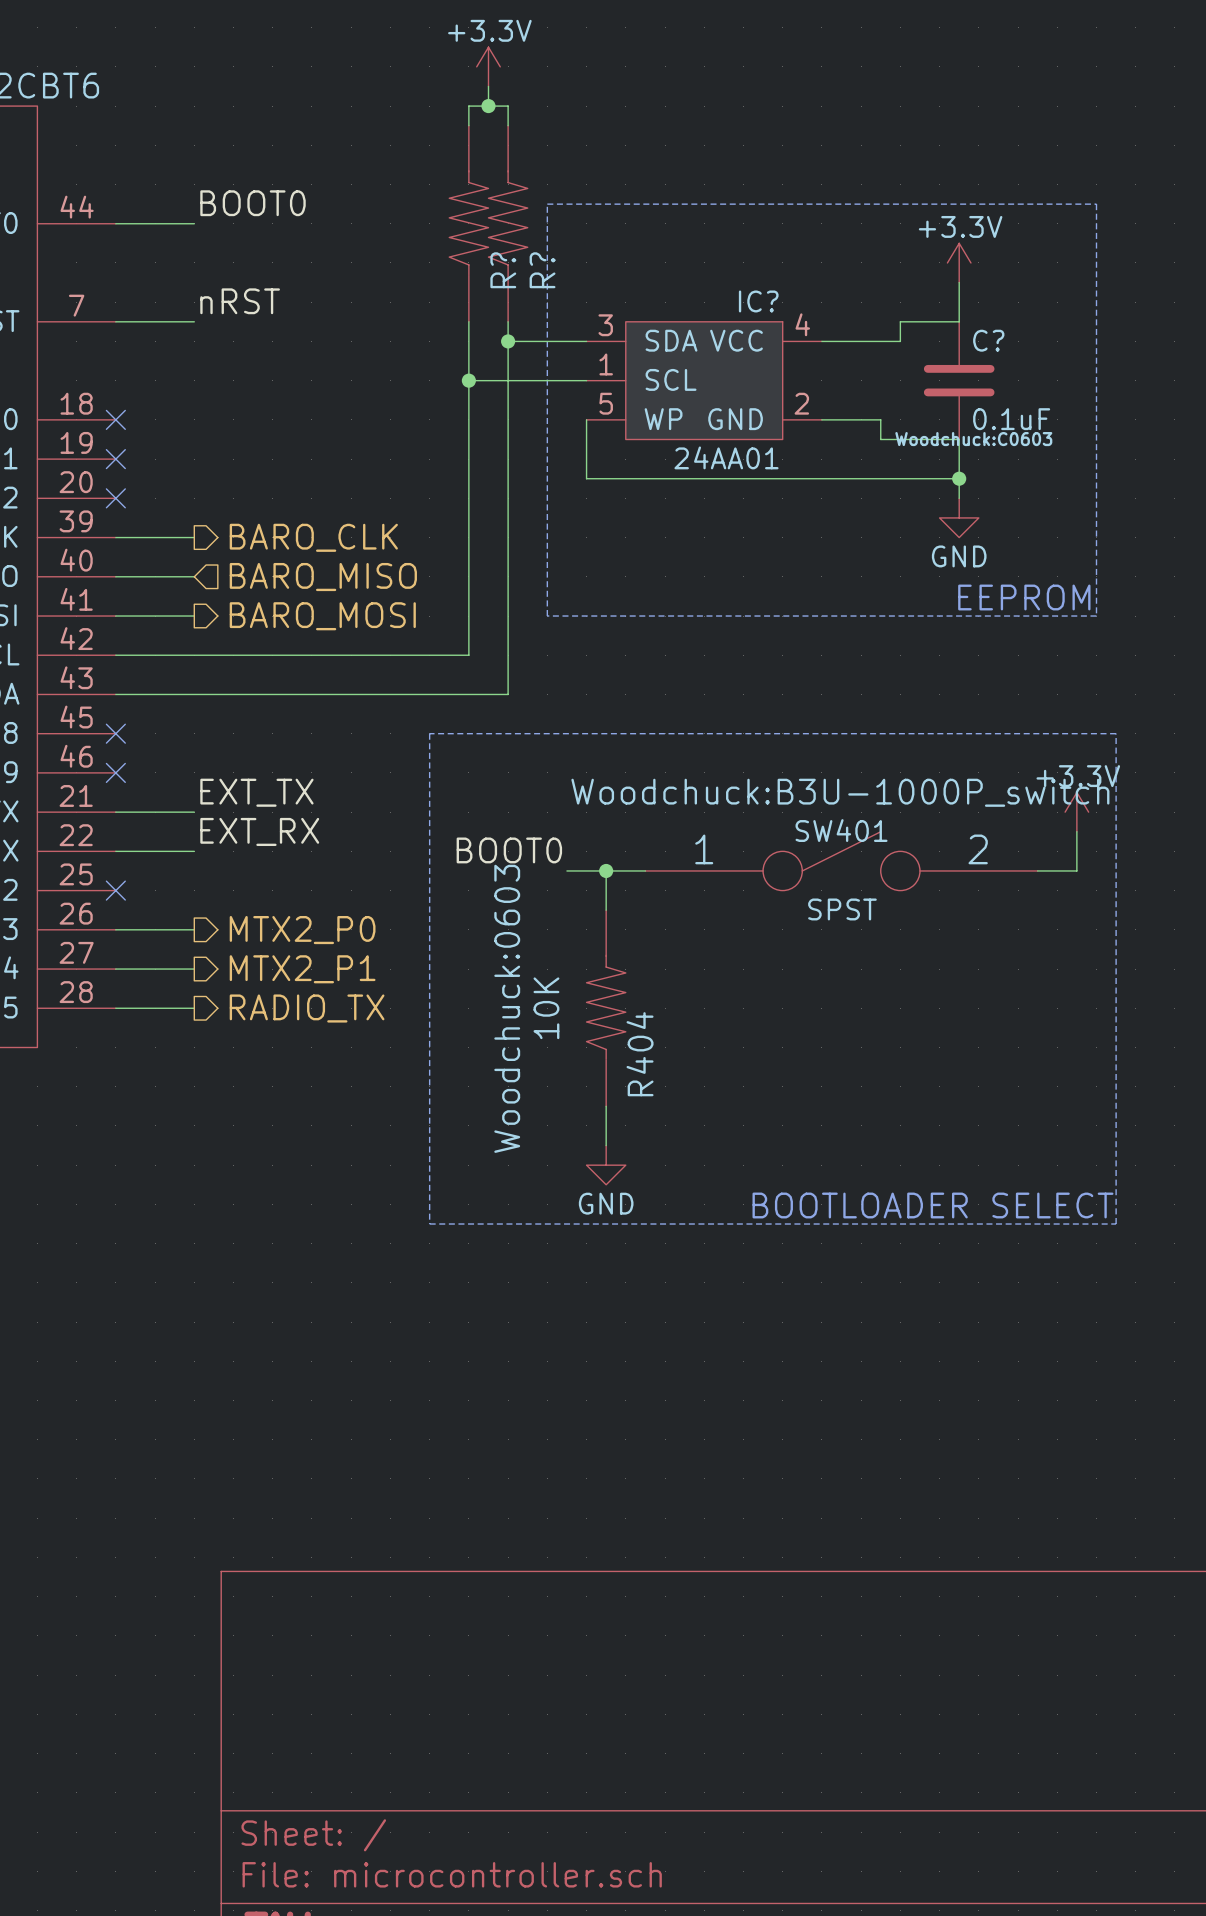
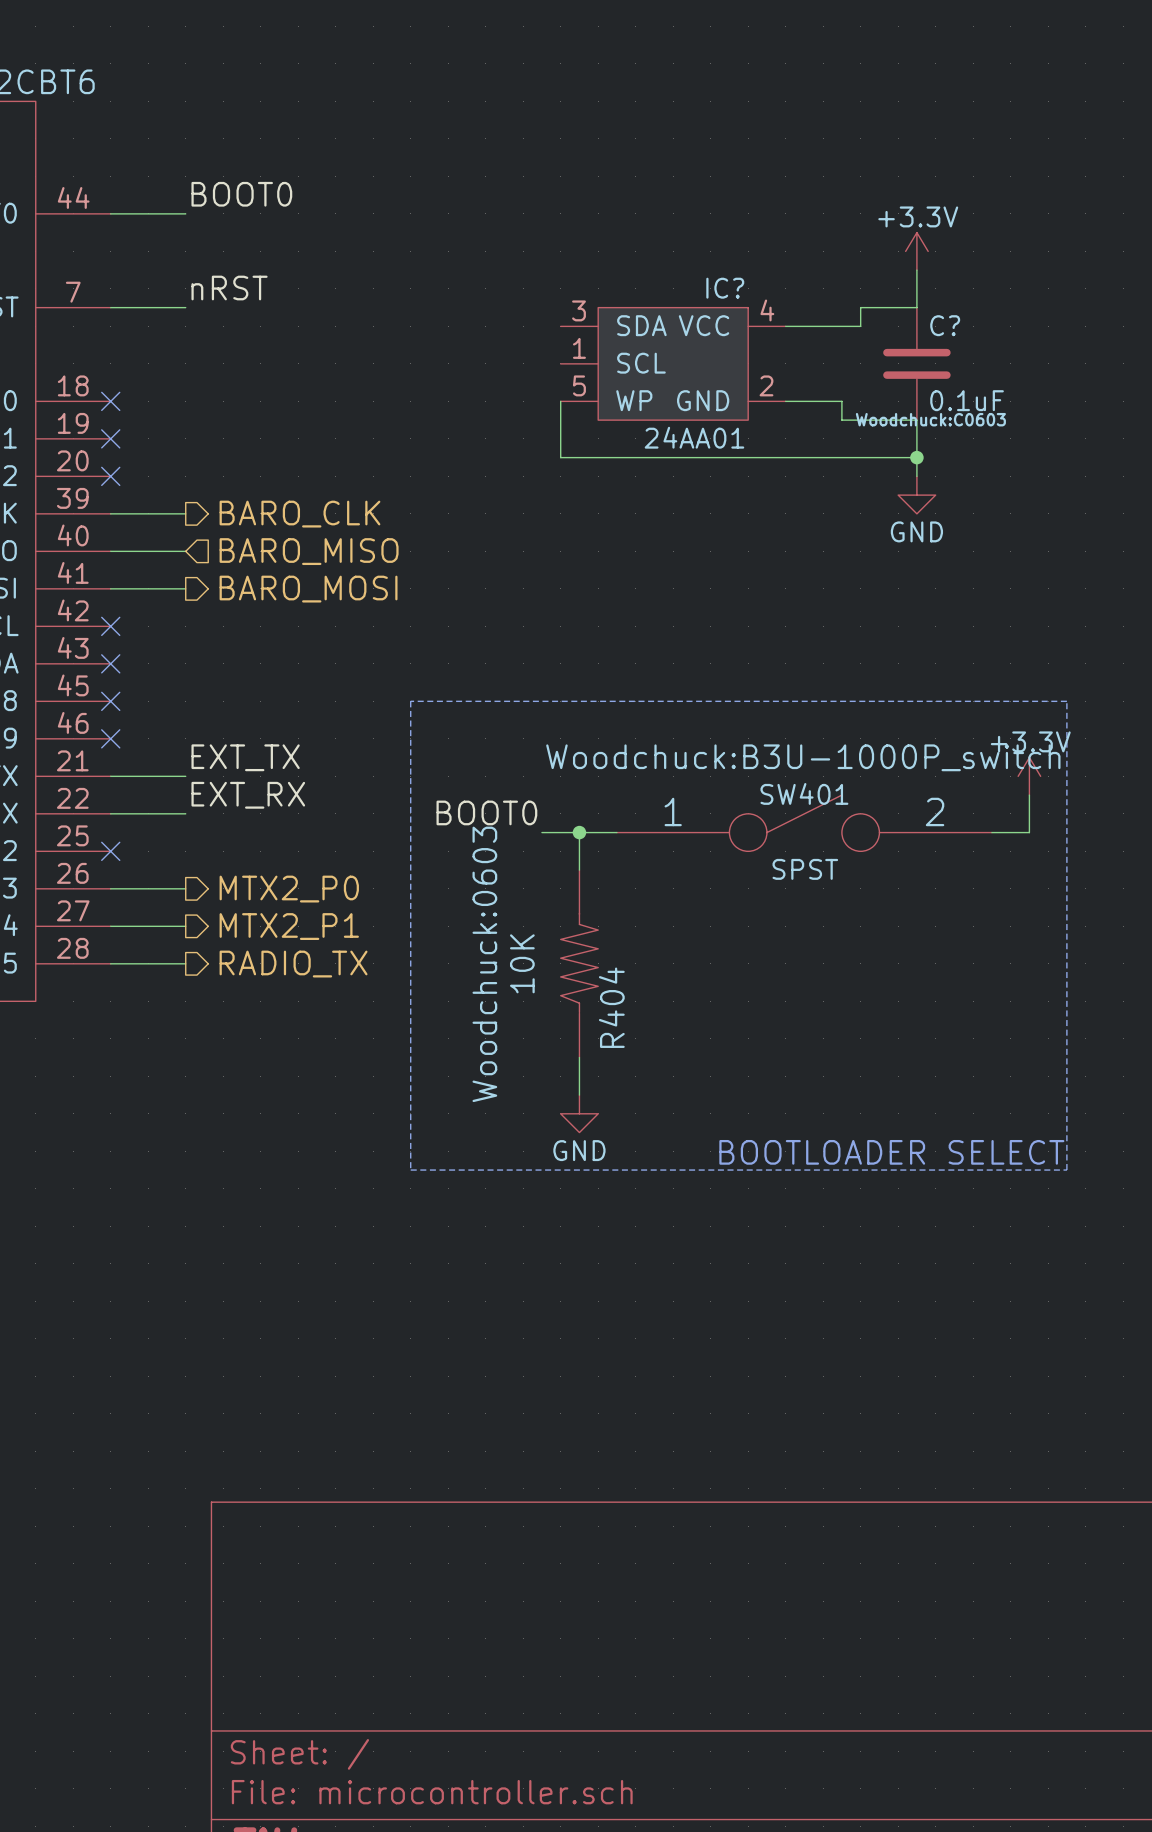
power symbol: +3.3V (488, 66) -> none
wire: (488, 86) (488, 106) -> none
junction: (488, 106) -> none
wire: (468, 125) (468, 106) (508, 106) (508, 125) -> none
line: (547, 204) (1096, 204) (1096, 616) (547, 616) (547, 204) -> none
R?: (468, 223) -> none
R?: (508, 223) -> none
wire: (468, 321) (468, 655) (115, 655) -> none
wire: (508, 321) (508, 694) (115, 694) -> none
wire: (508, 341) (586, 341) -> none
junction: (508, 341) -> none
wire: (468, 380) (586, 380) -> none
junction: (468, 380) -> none
text: EEPROM (1024, 597) -> none
no-connect mark: none -> (110, 626)
no-connect mark: none -> (110, 663)

